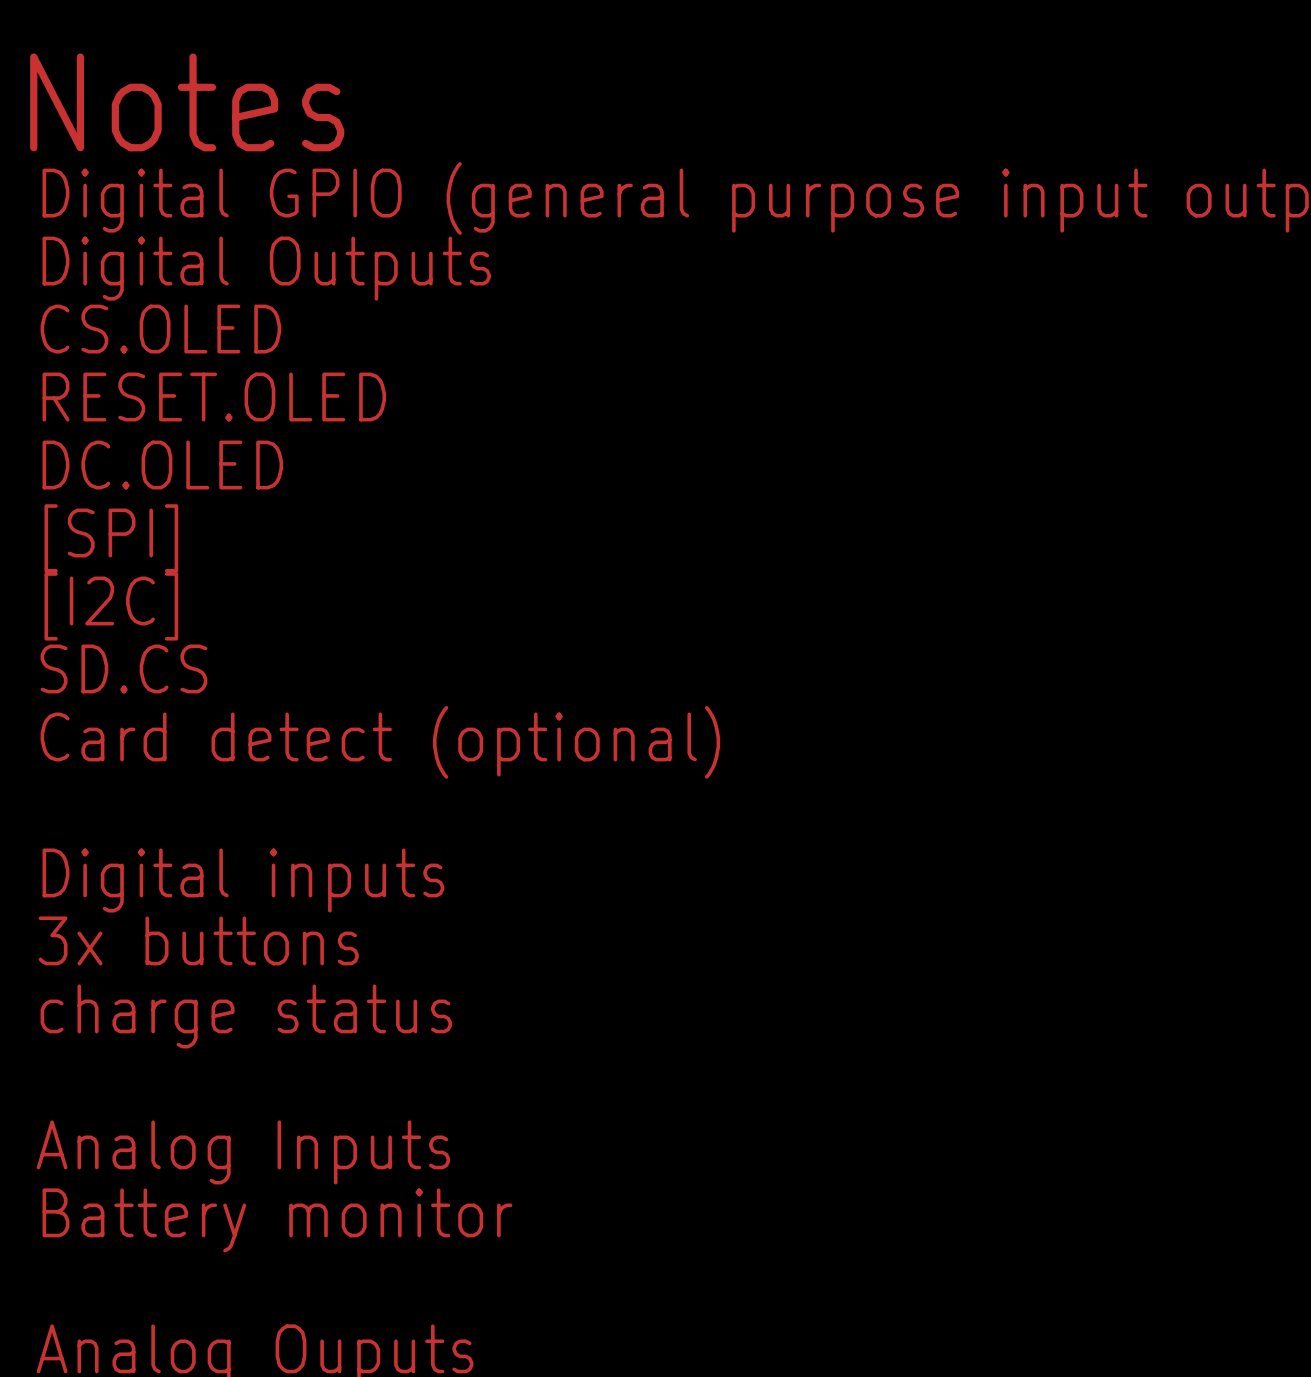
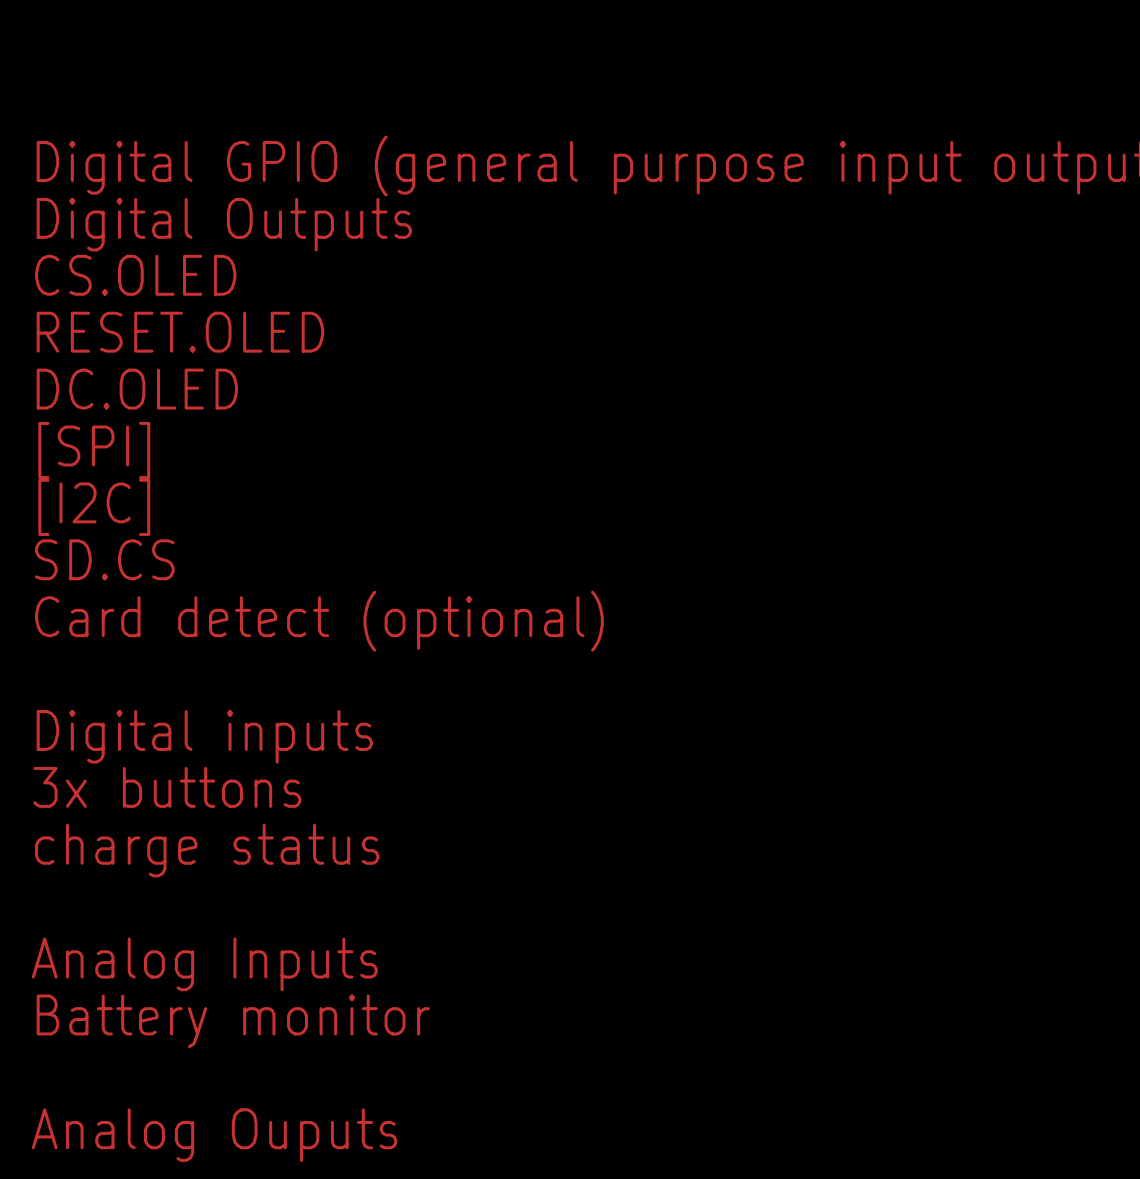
text: Notes (187, 102) -> none

